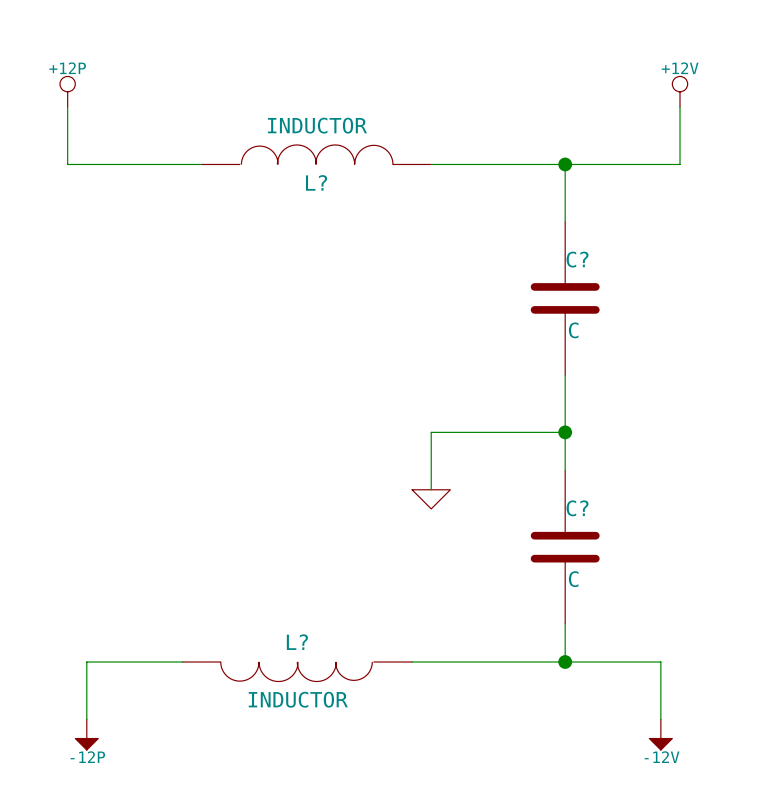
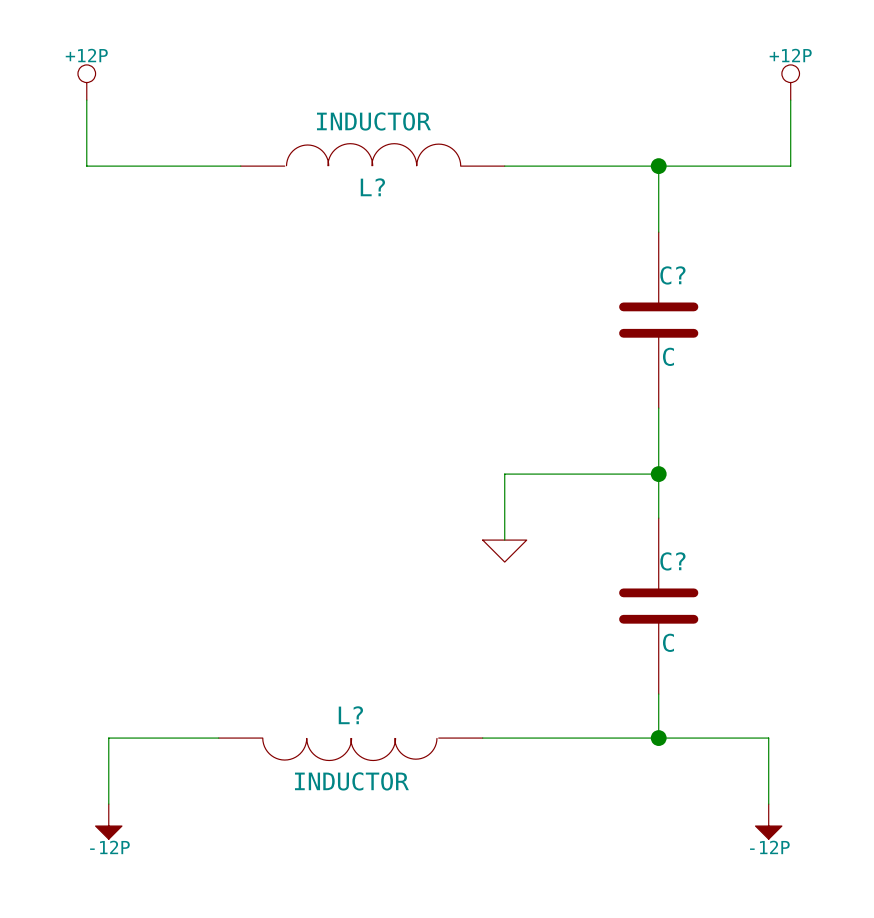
power symbol: +12V (680, 91) -> +12P (790, 82)
power symbol: -12V (660, 734) -> -12P (768, 821)

